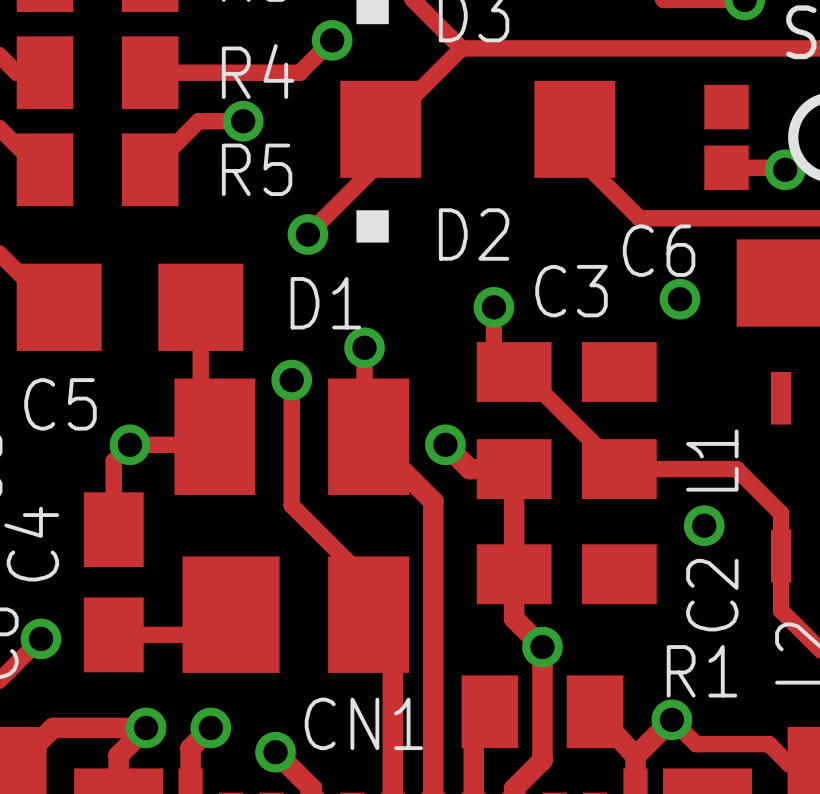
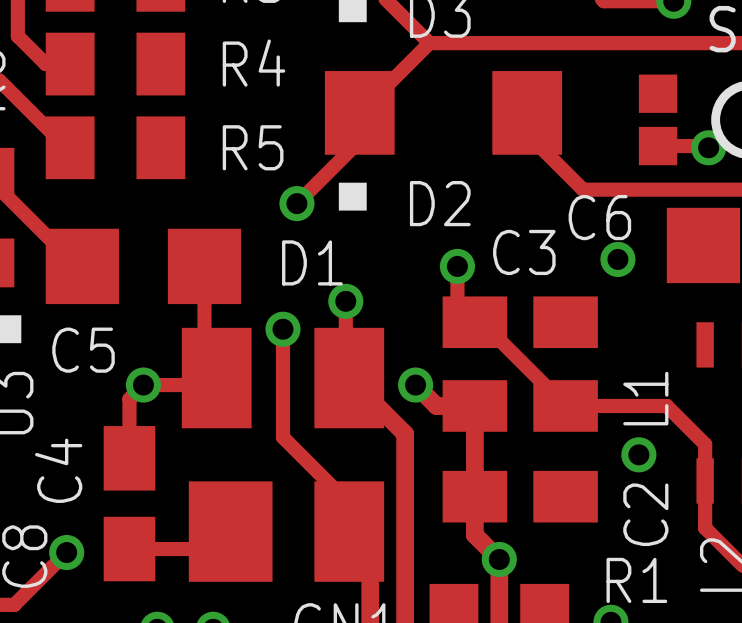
track: (332, 40) (299, 72) (150, 72) -> none
via: (332, 40) -> none
track: (243, 121) (198, 121) (150, 169) -> none
via: (243, 121) -> none

